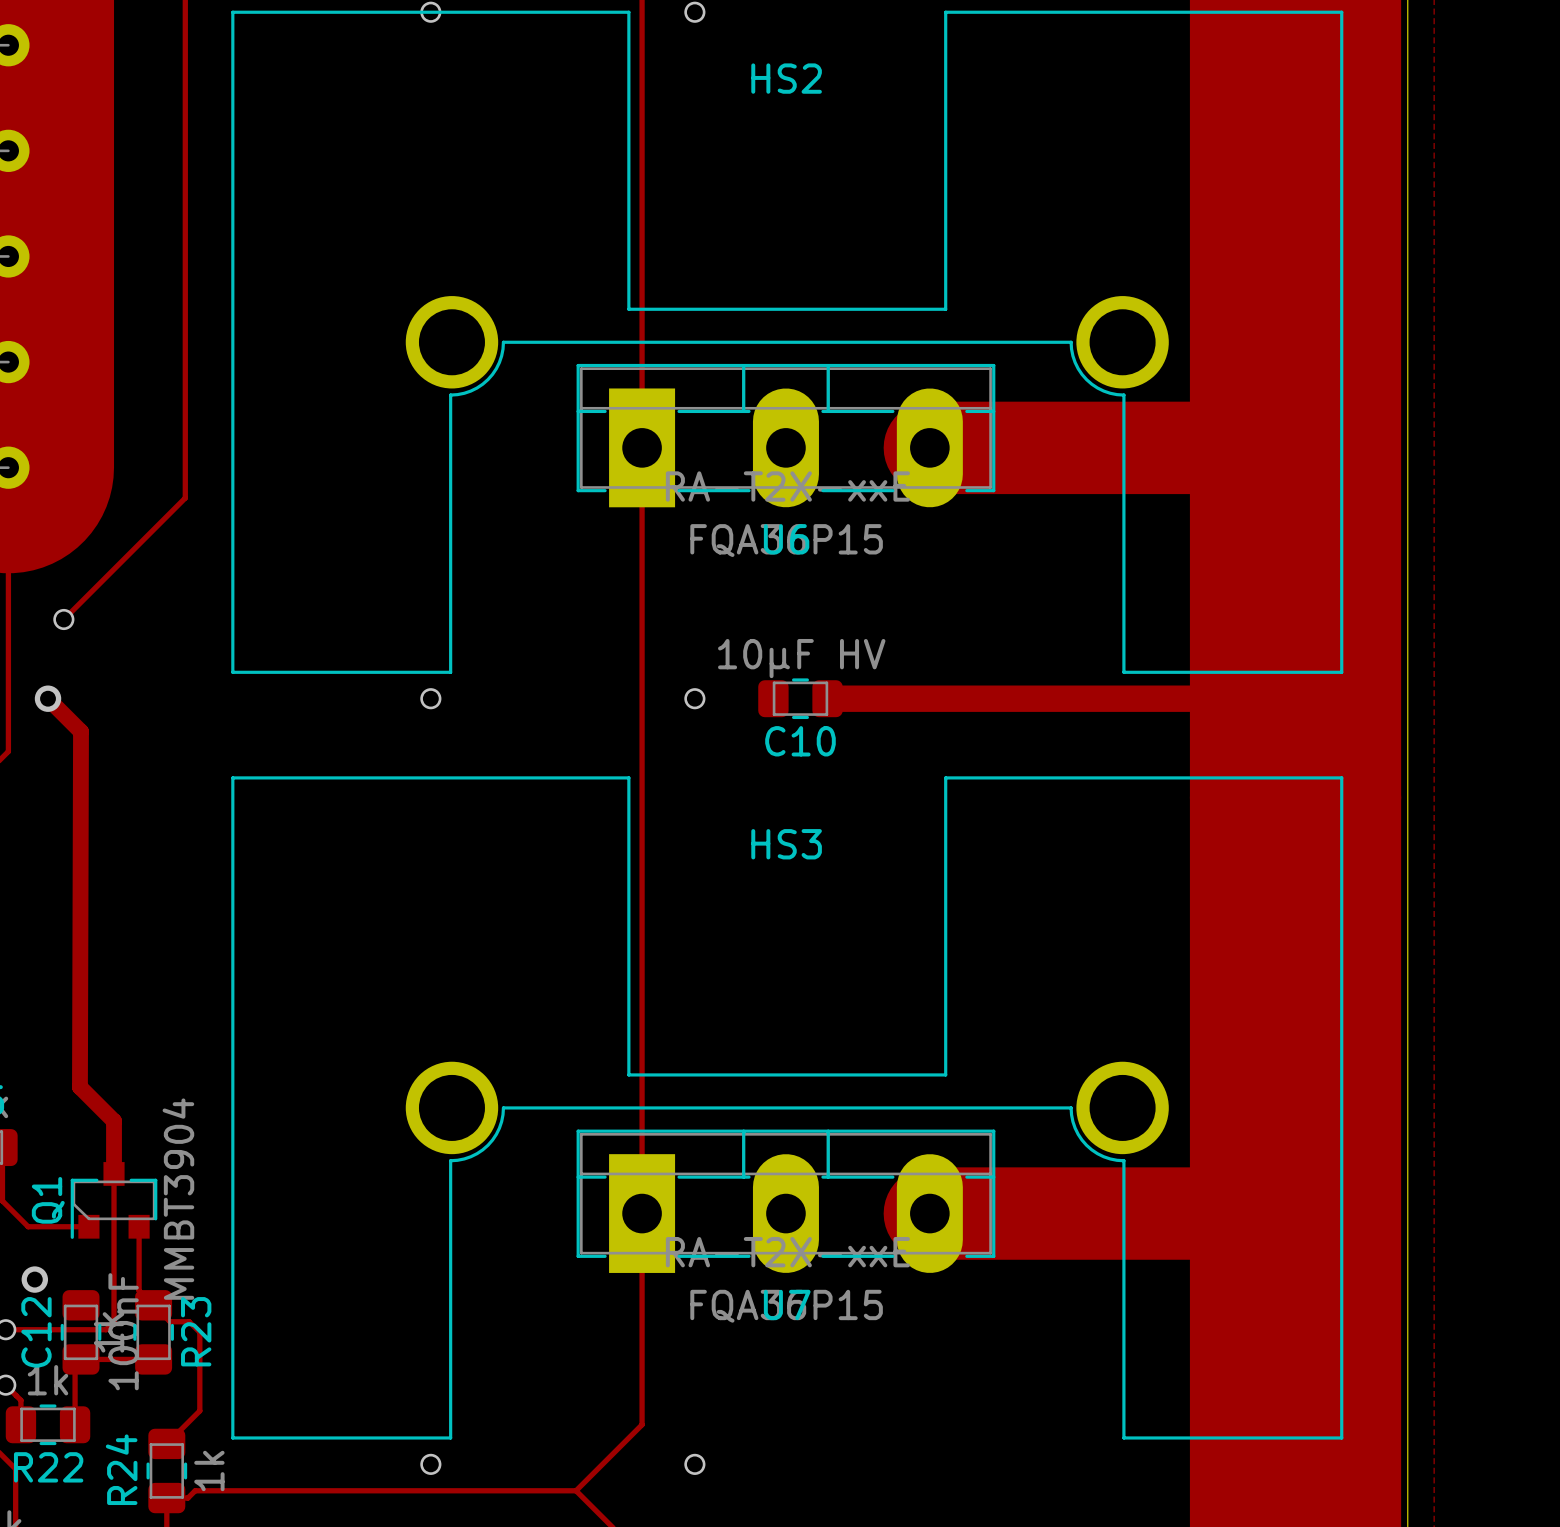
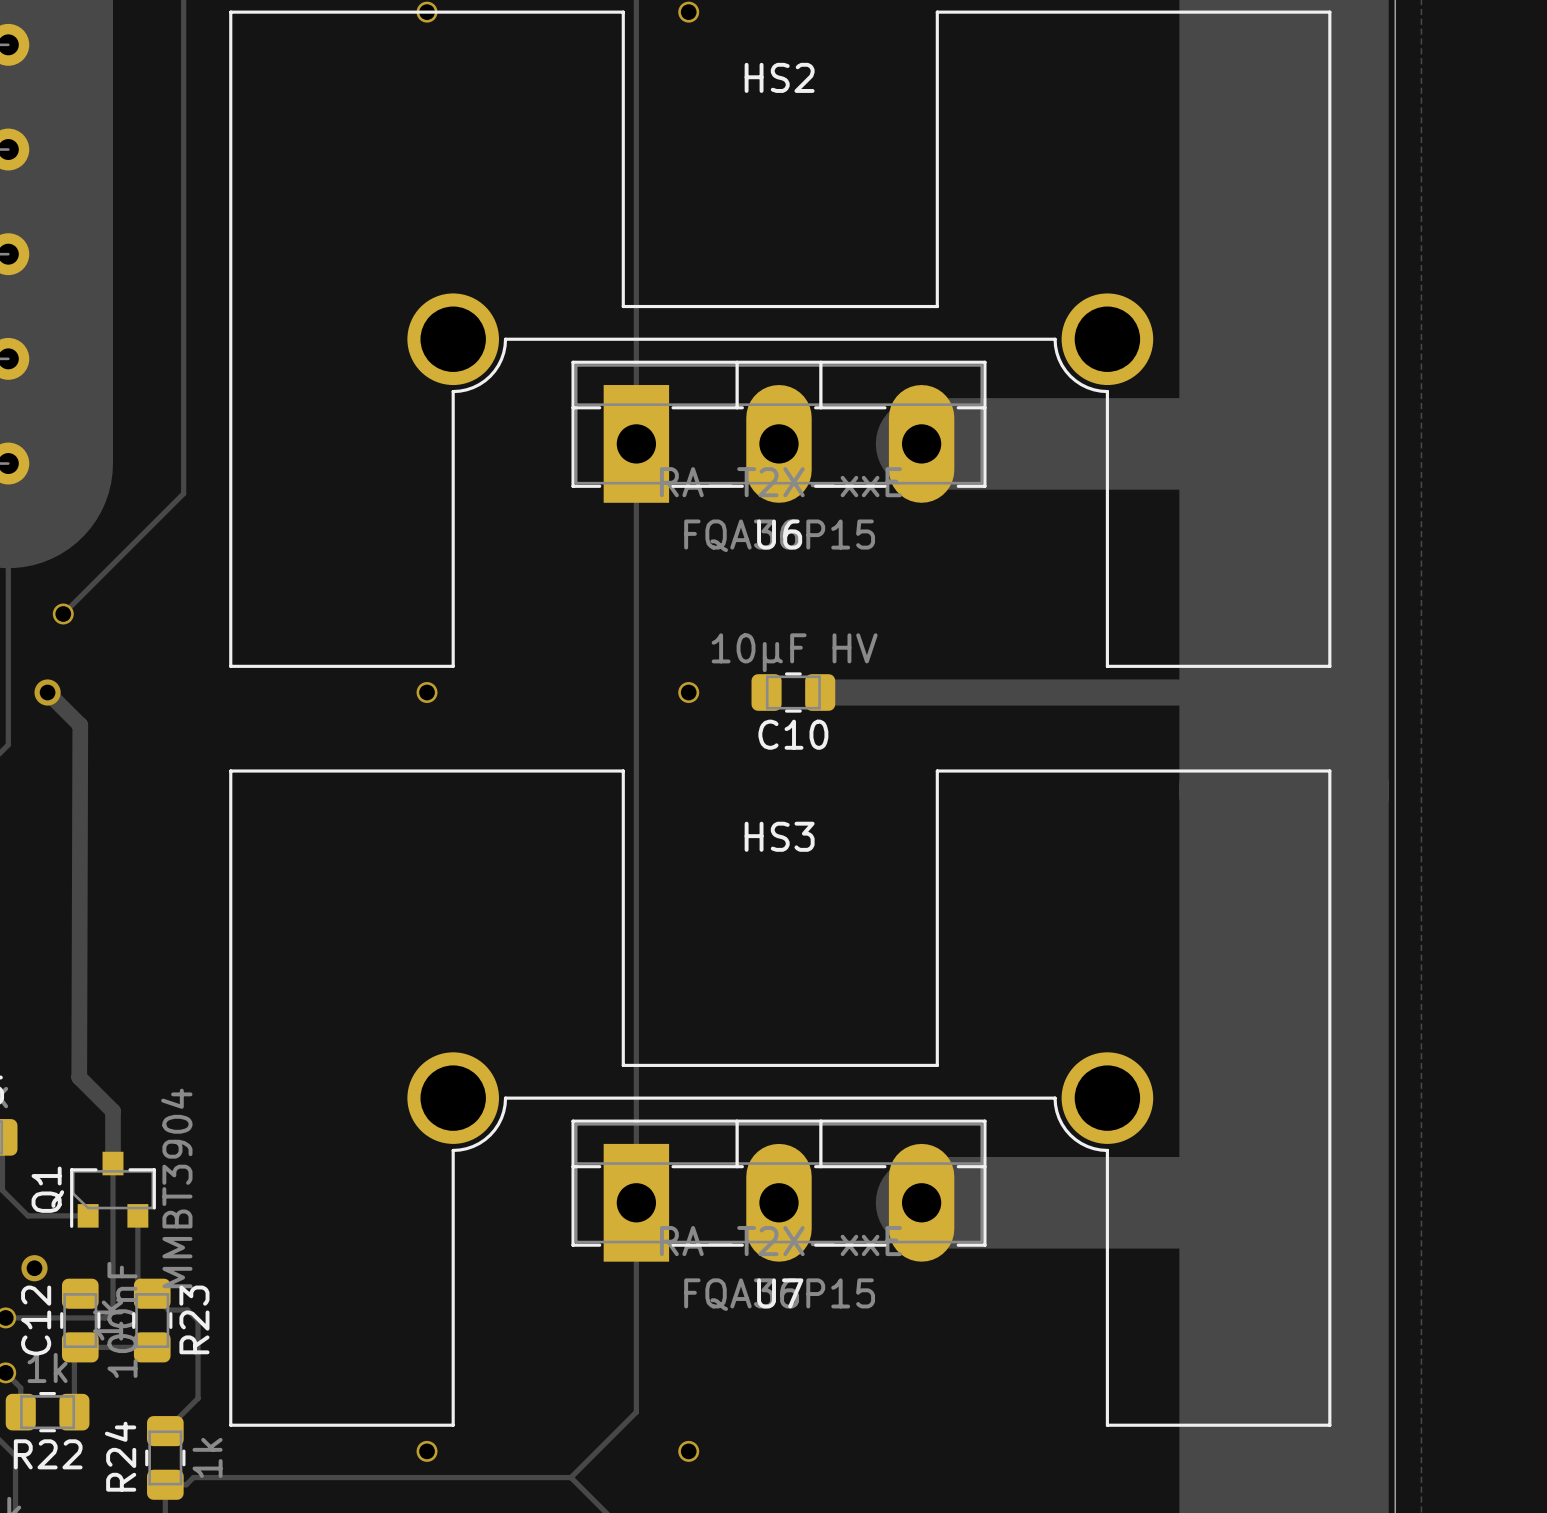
HS2 footprint: [231, 10, 1344, 674] -> [229, 10, 1332, 668]
HS3 footprint: [231, 776, 1344, 1440] -> [229, 769, 1332, 1427]

